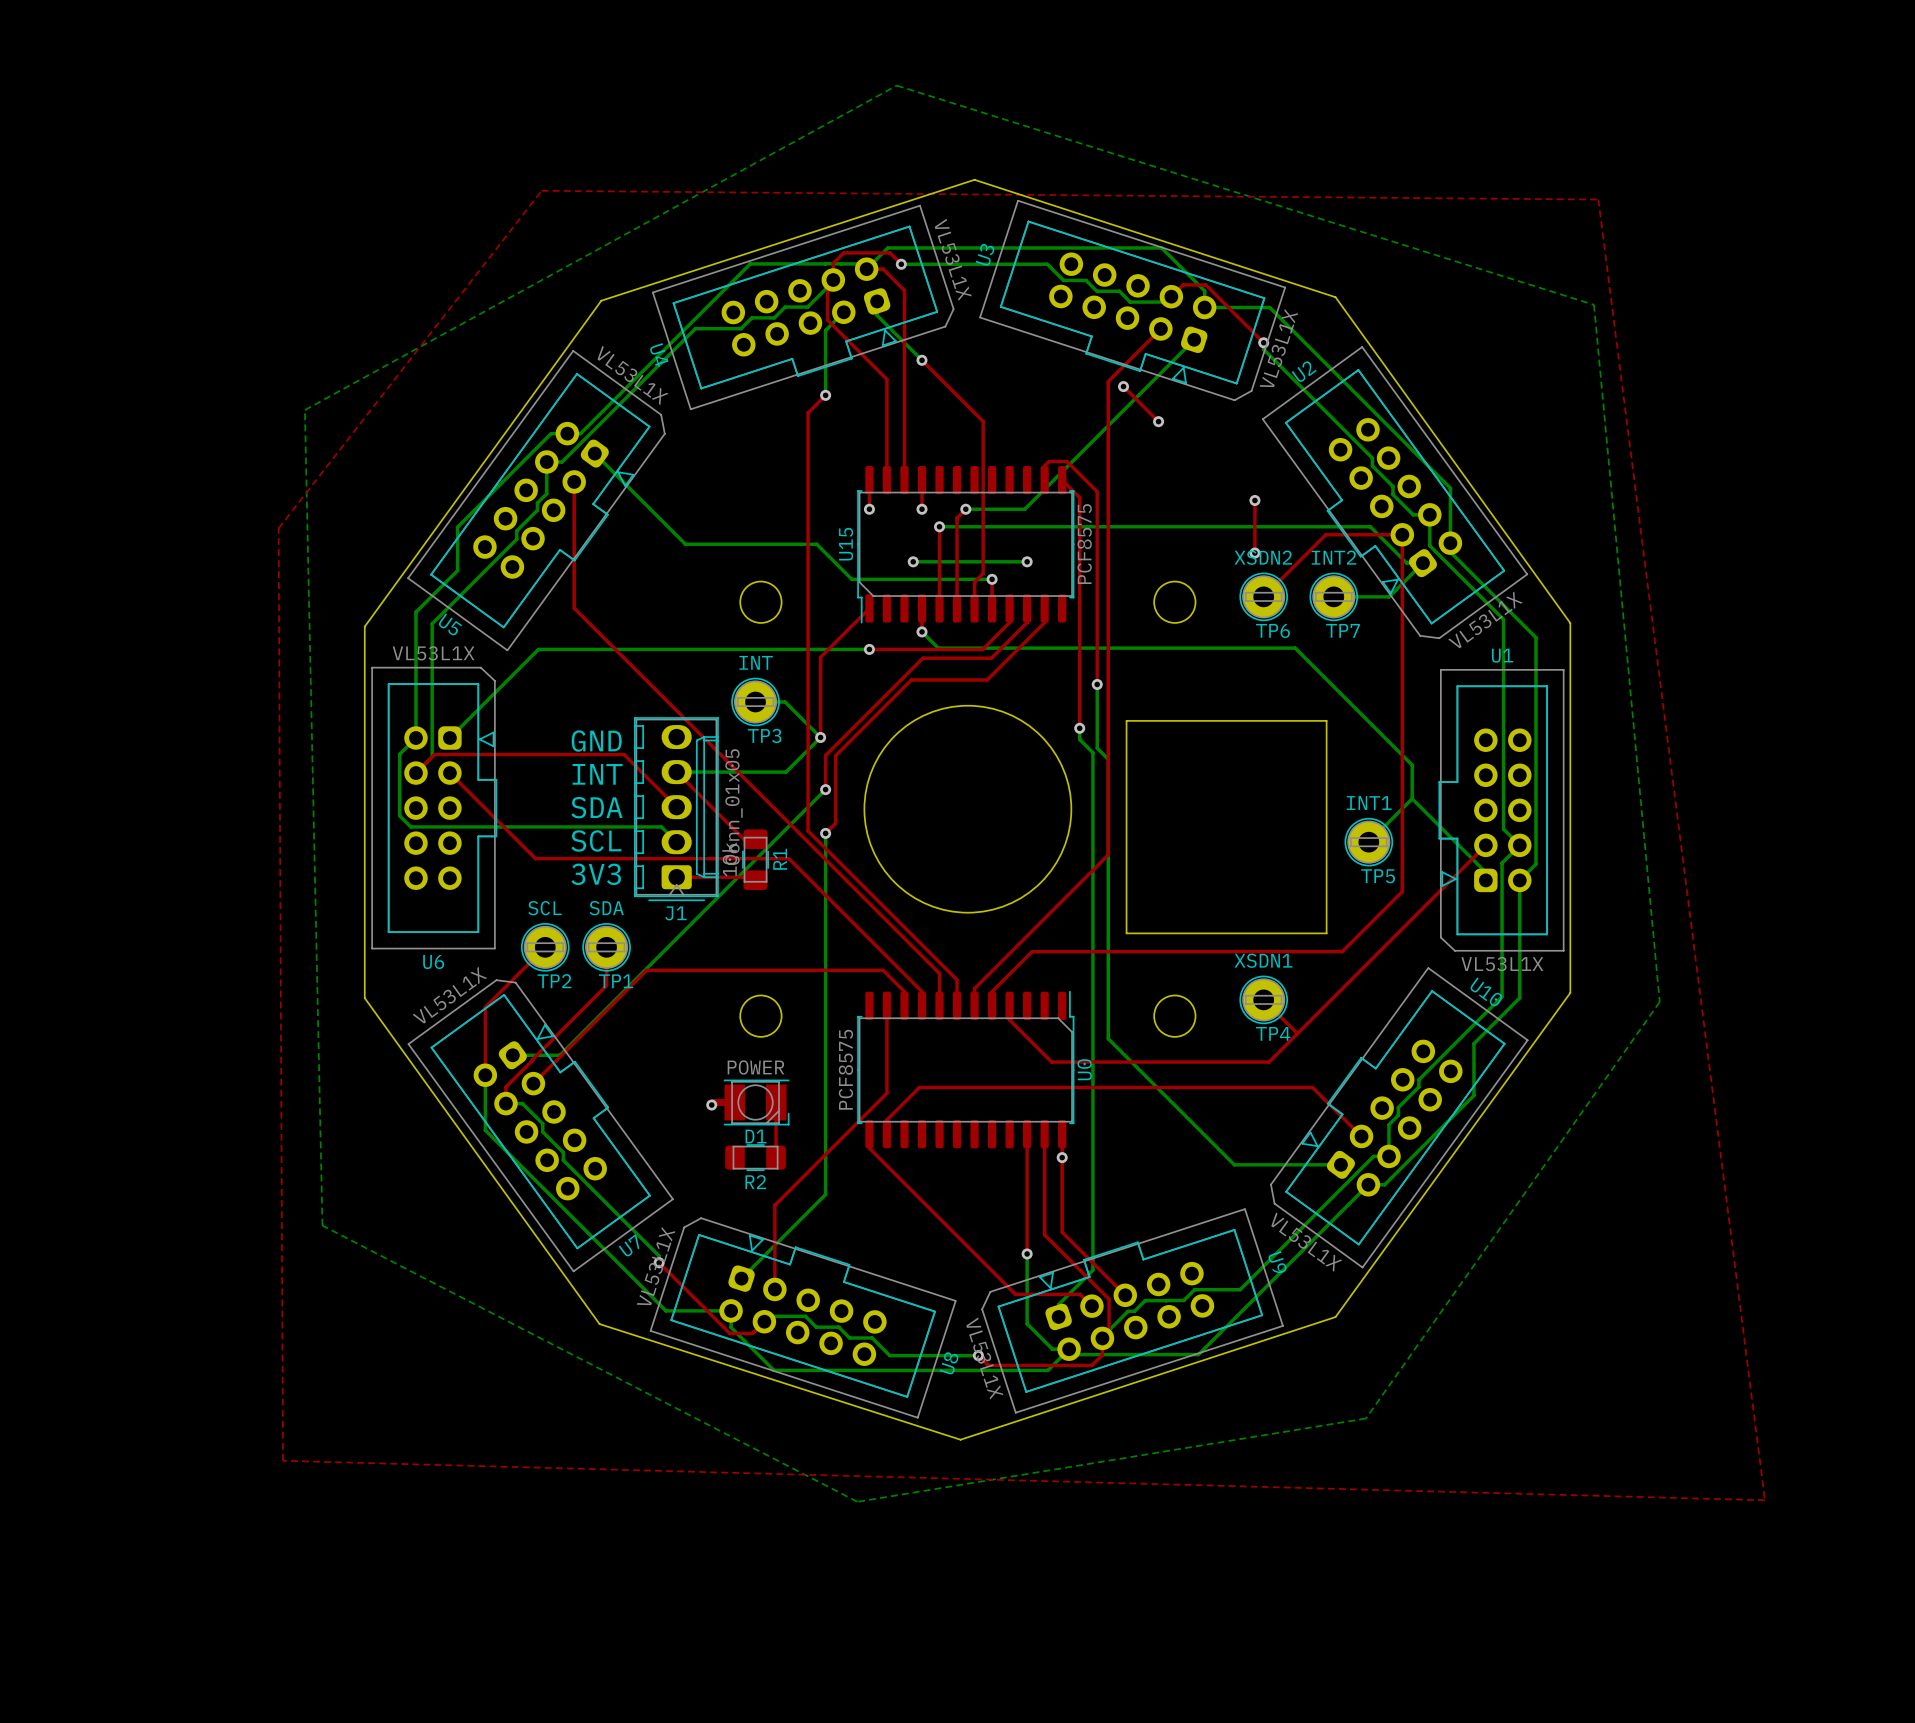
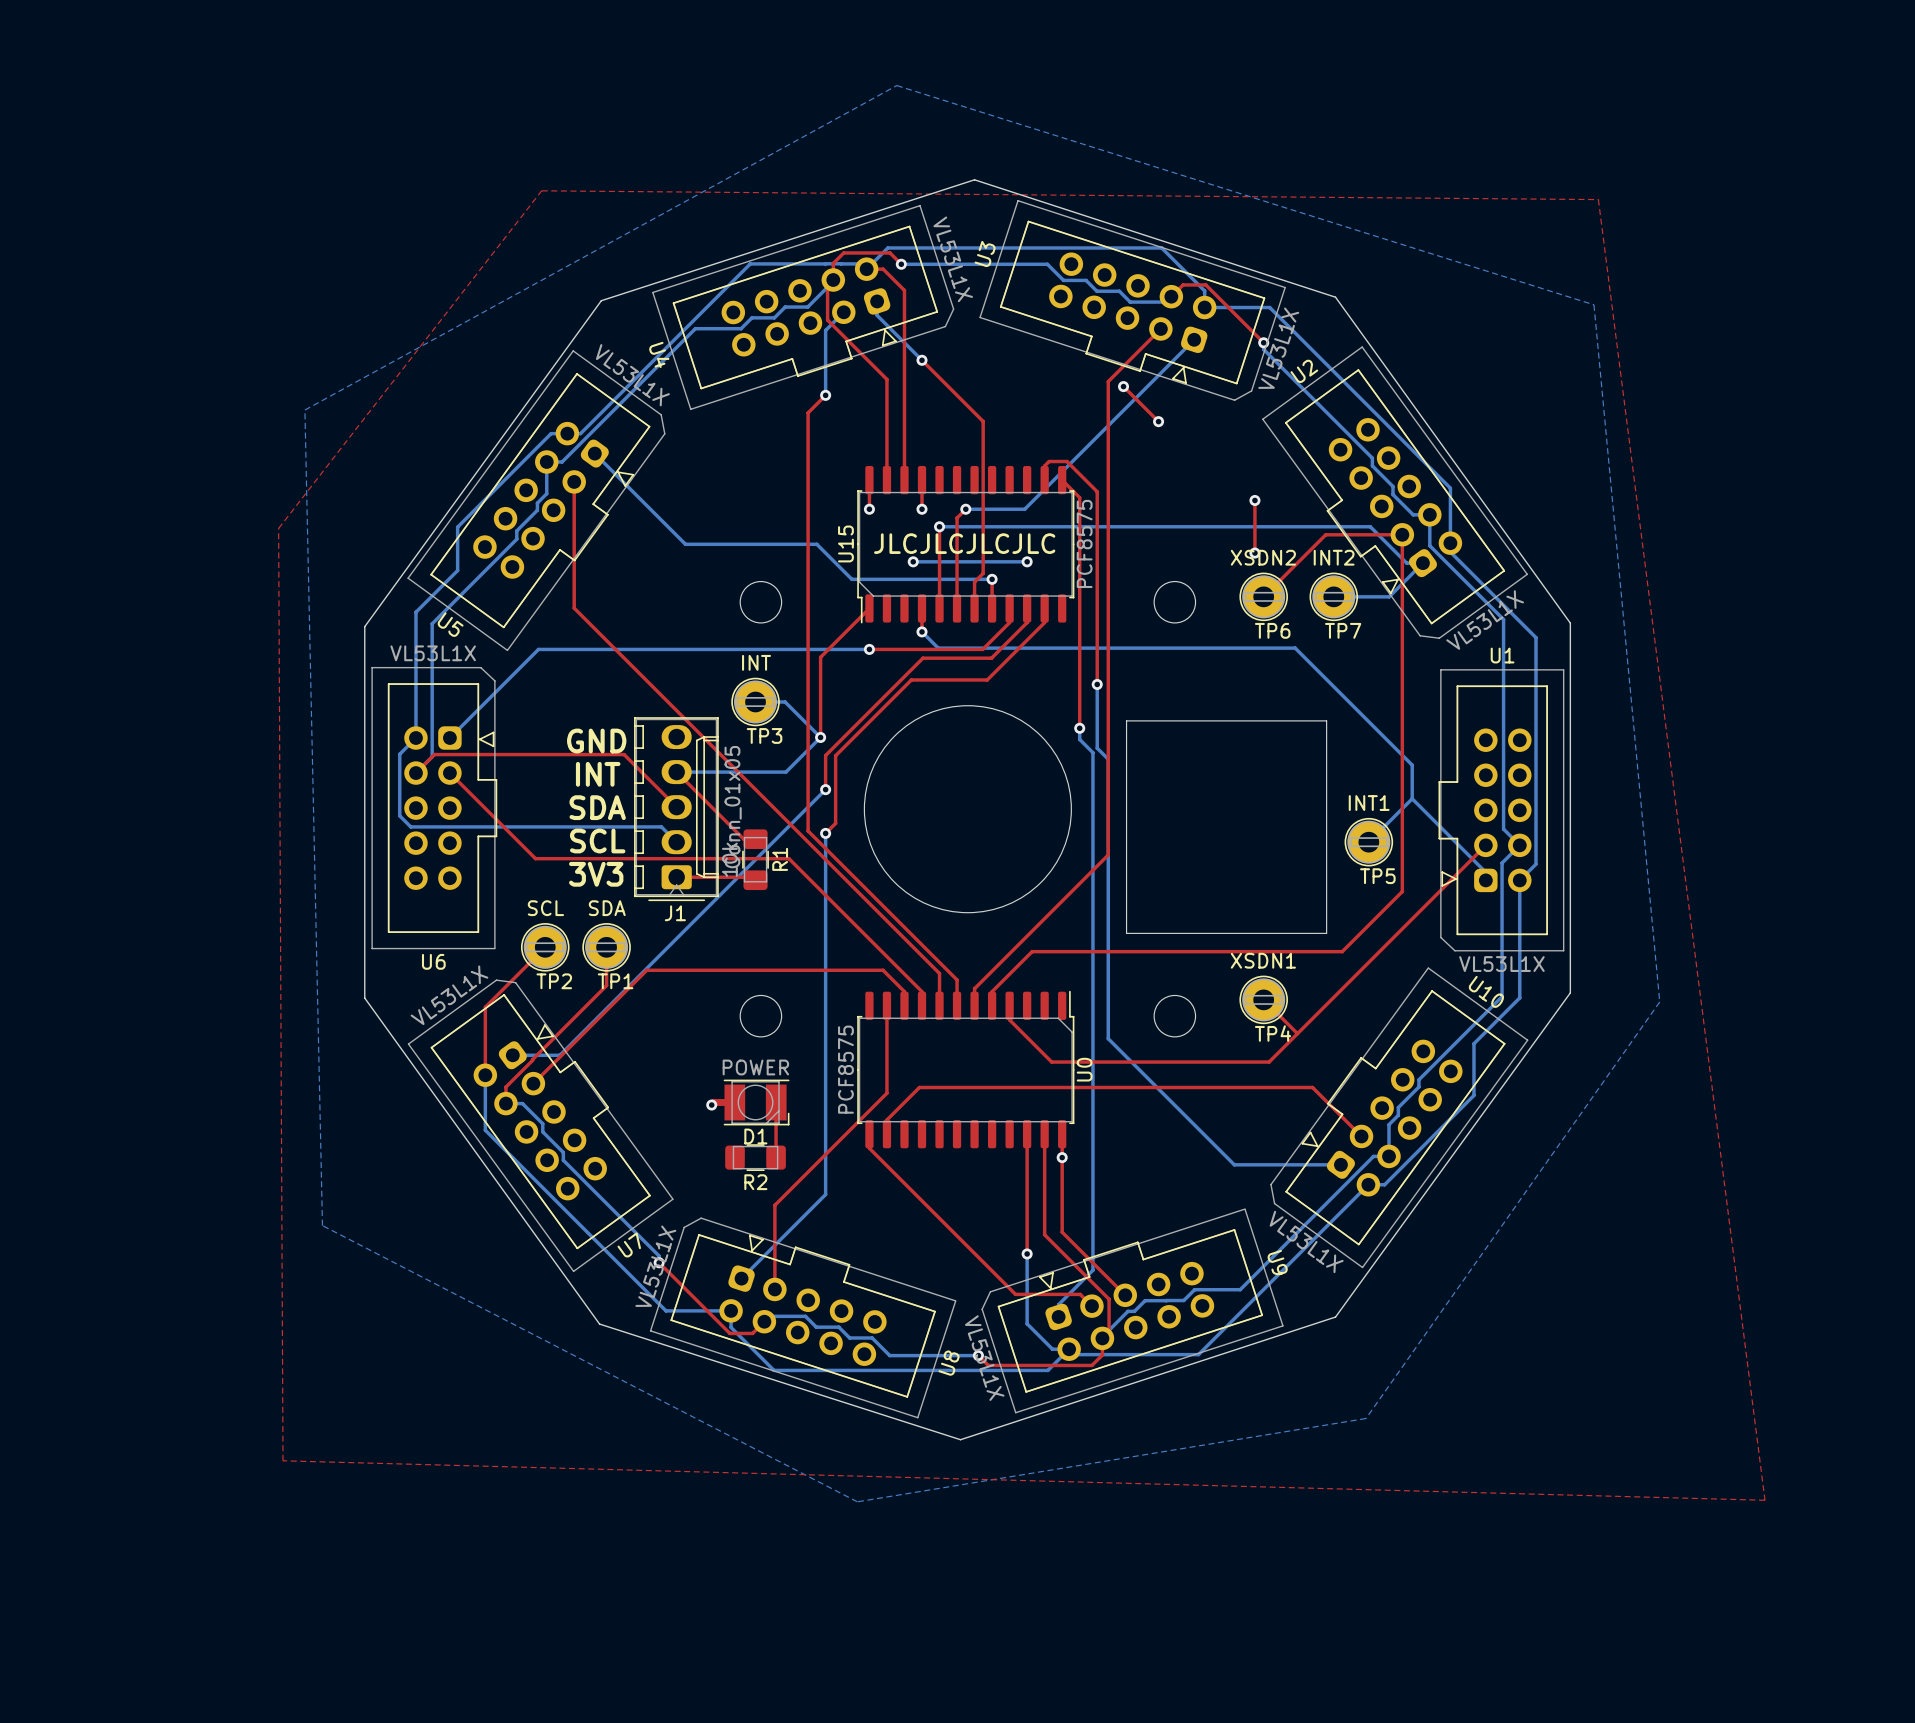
text: none -> JLCJLCJLCJLC (964, 543)

